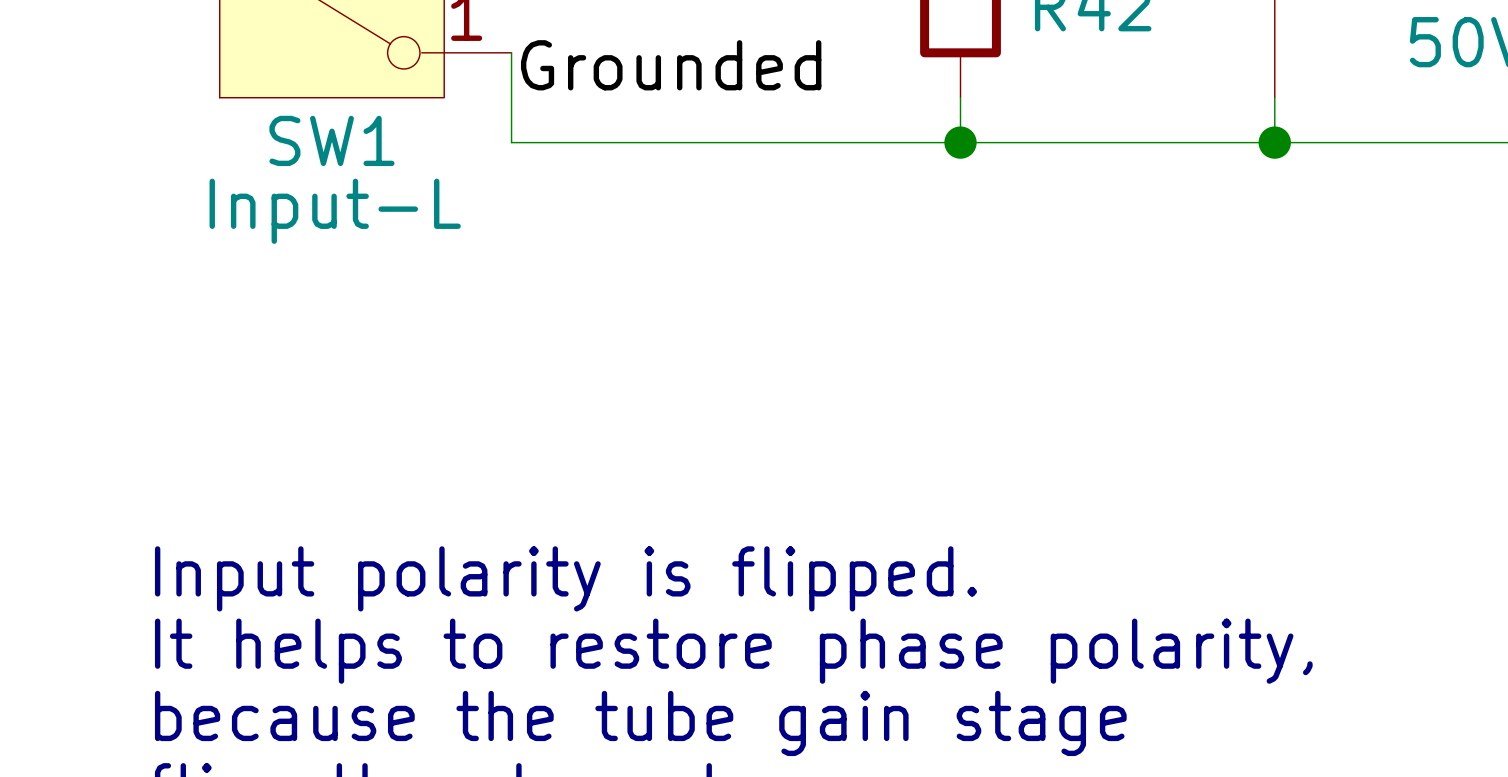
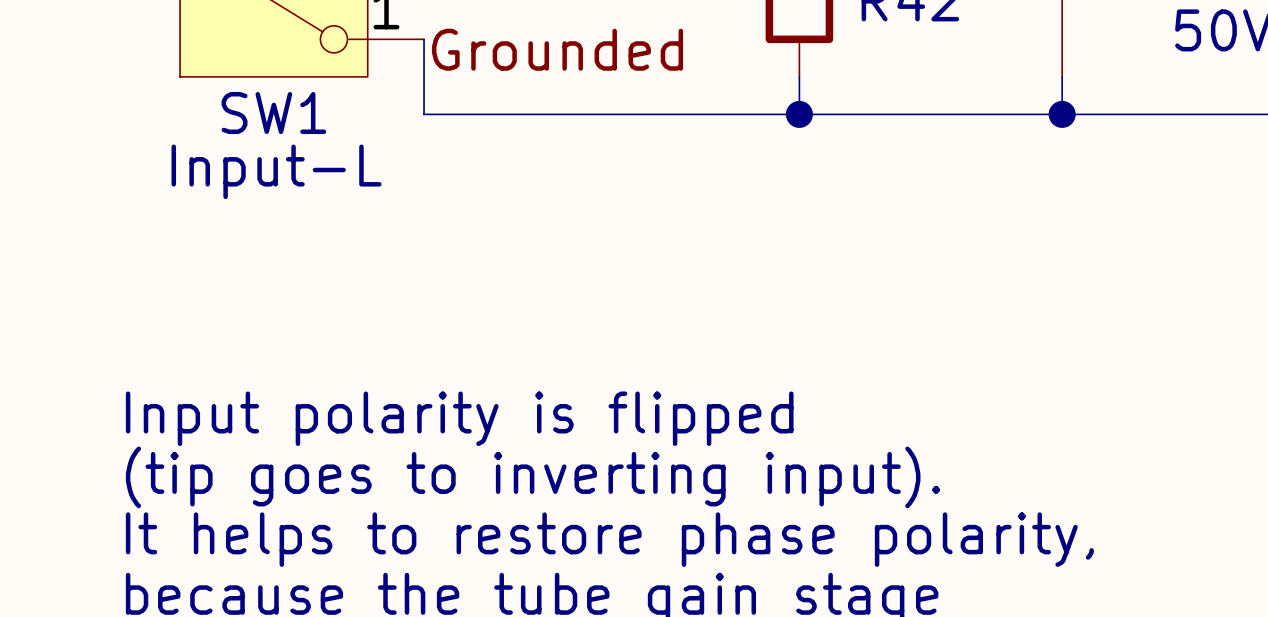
text: none -> Input polarity is flipped (459, 418)
text: Input polarity is flipped. (565, 578) -> (tip goes to inverting input). (532, 477)

